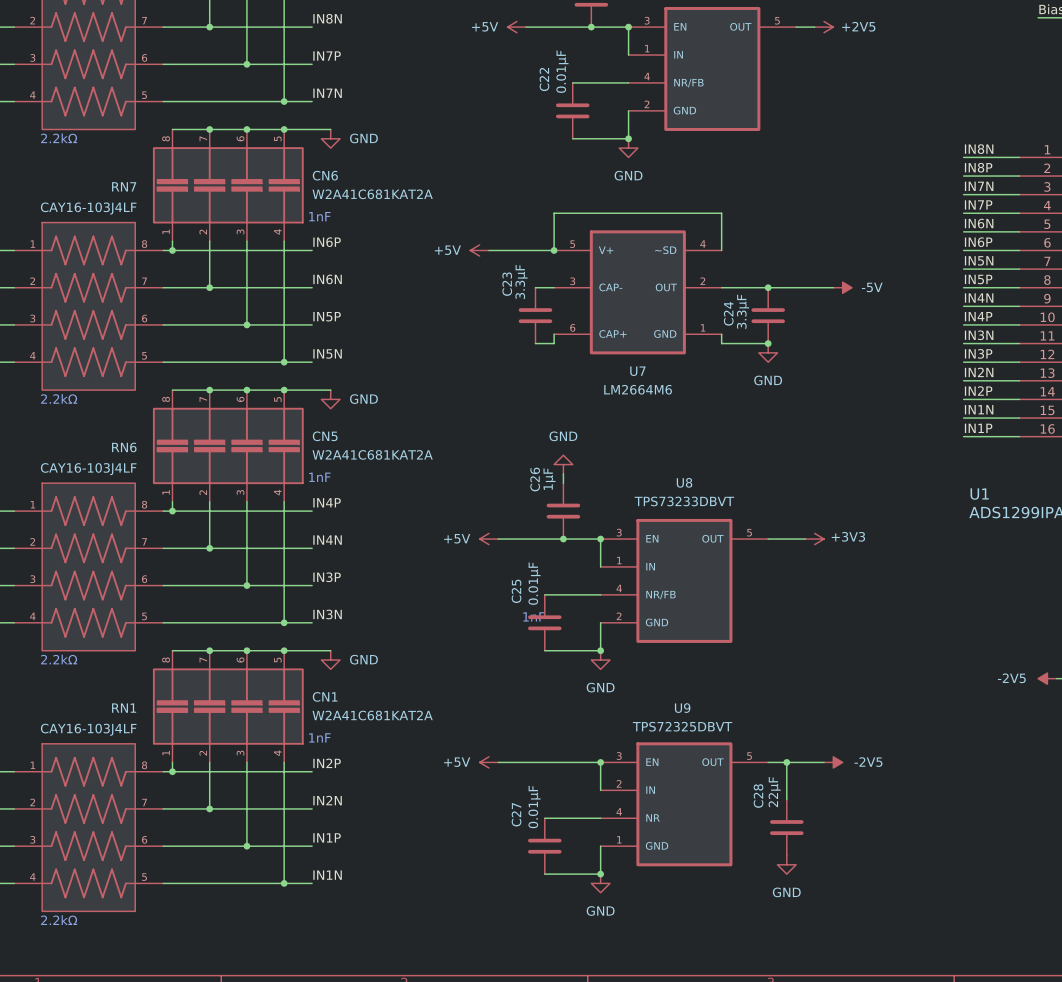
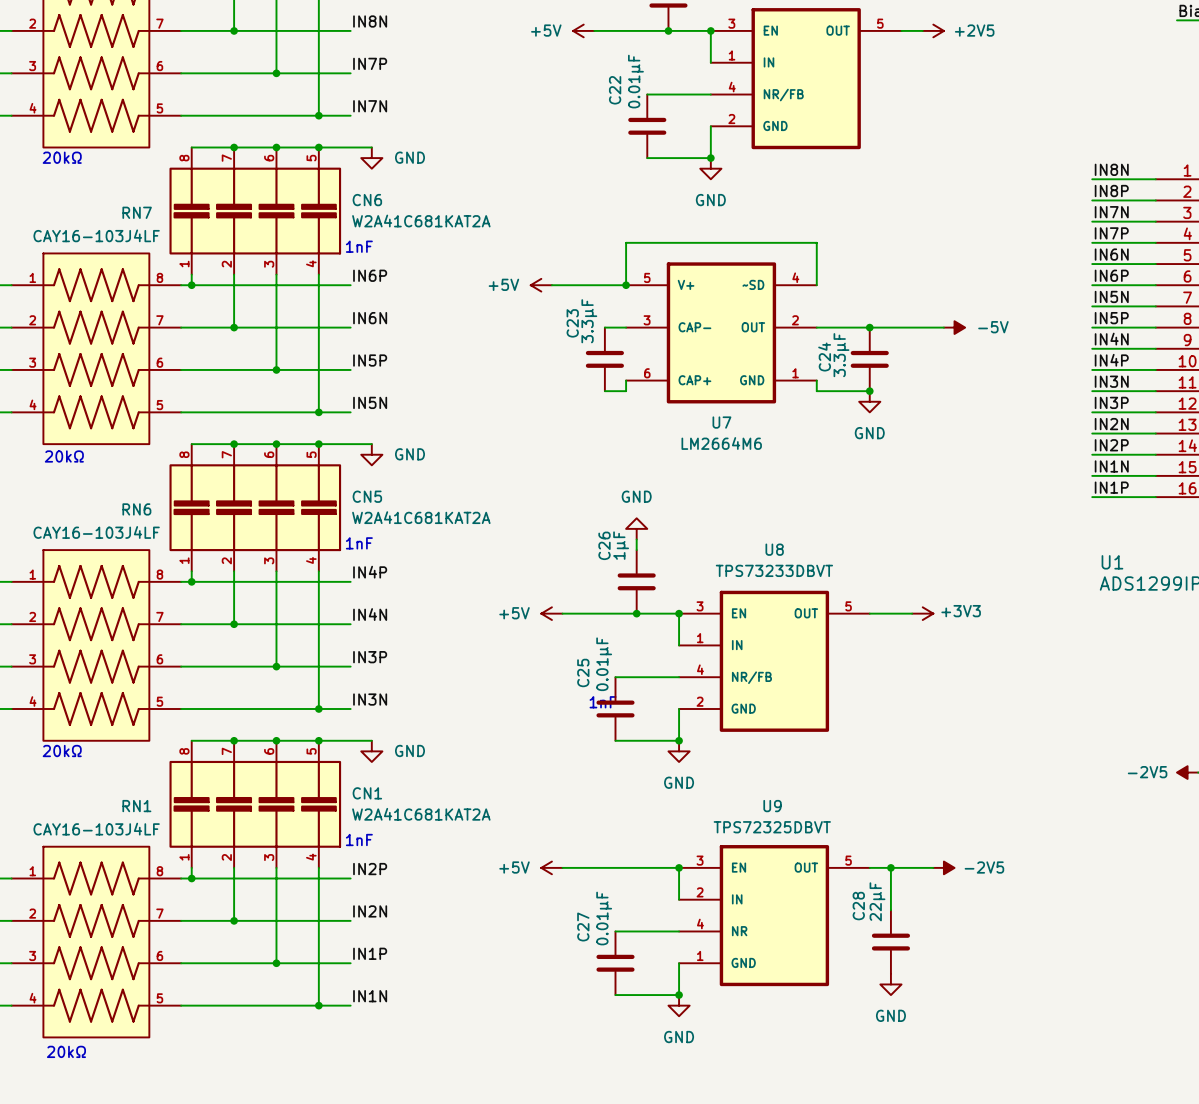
text: 2.2kΩ (59, 138) -> 20kΩ (62, 157)
text: 2.2kΩ (59, 398) -> 20kΩ (64, 456)
text: 2.2kΩ (59, 659) -> 20kΩ (62, 751)
text: 2.2kΩ (59, 920) -> 20kΩ (66, 1051)

